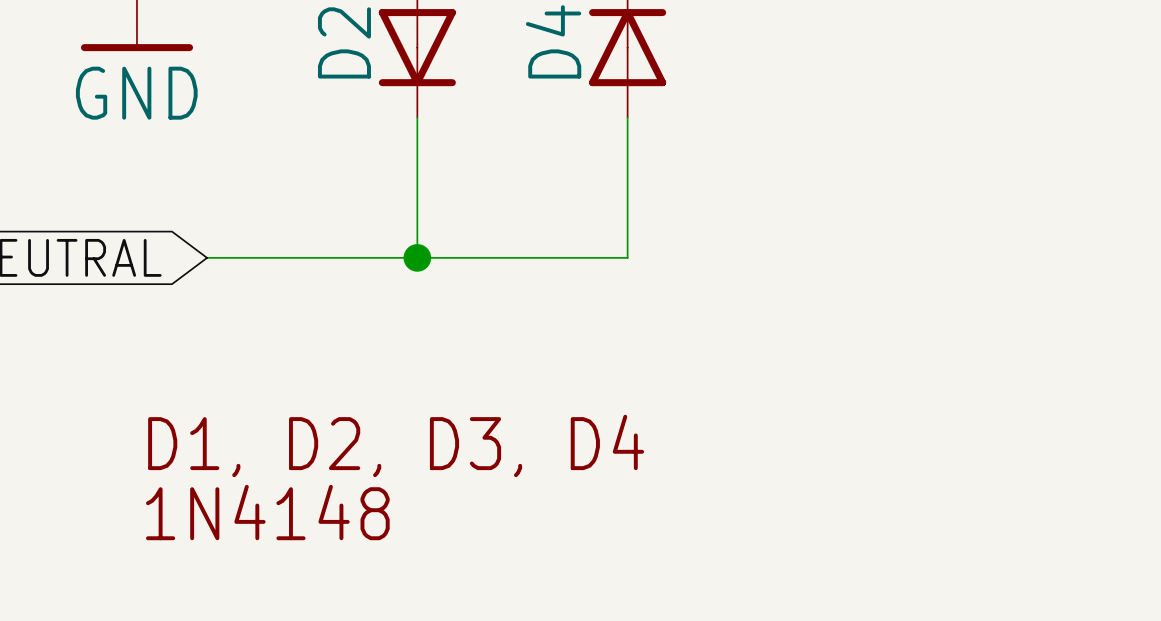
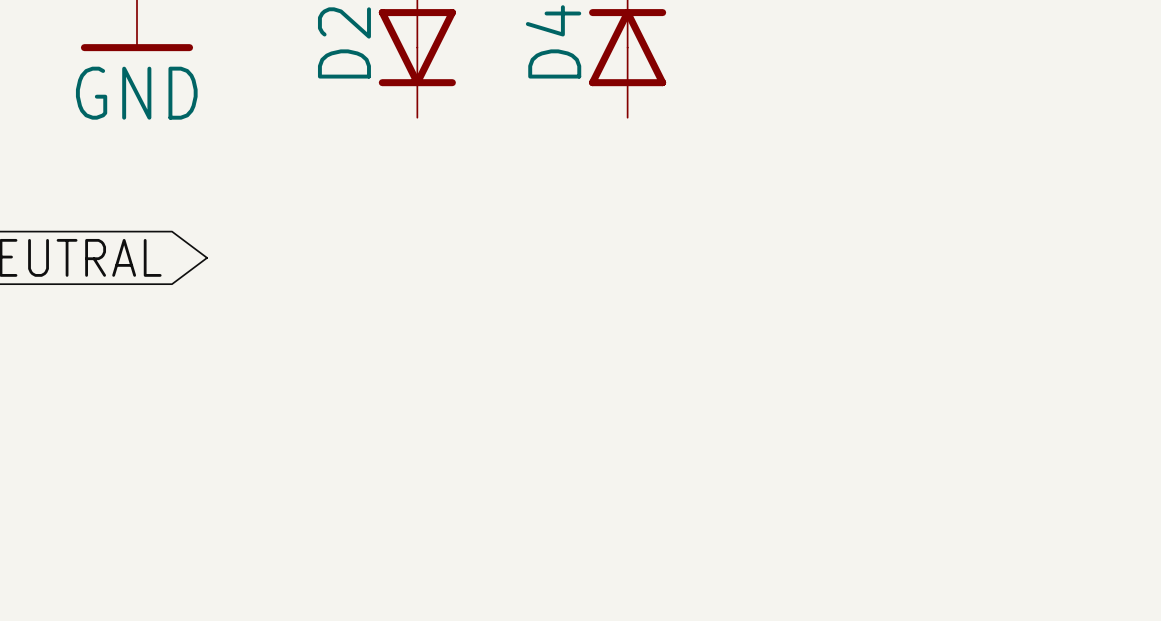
wire: (417, 117) (417, 257) -> none
wire: (627, 117) (627, 257) (207, 257) -> none
junction: (417, 257) -> none
text: D1, D2, D3, D4 (396, 445) -> none
text: 1N4148 (267, 512) -> none

